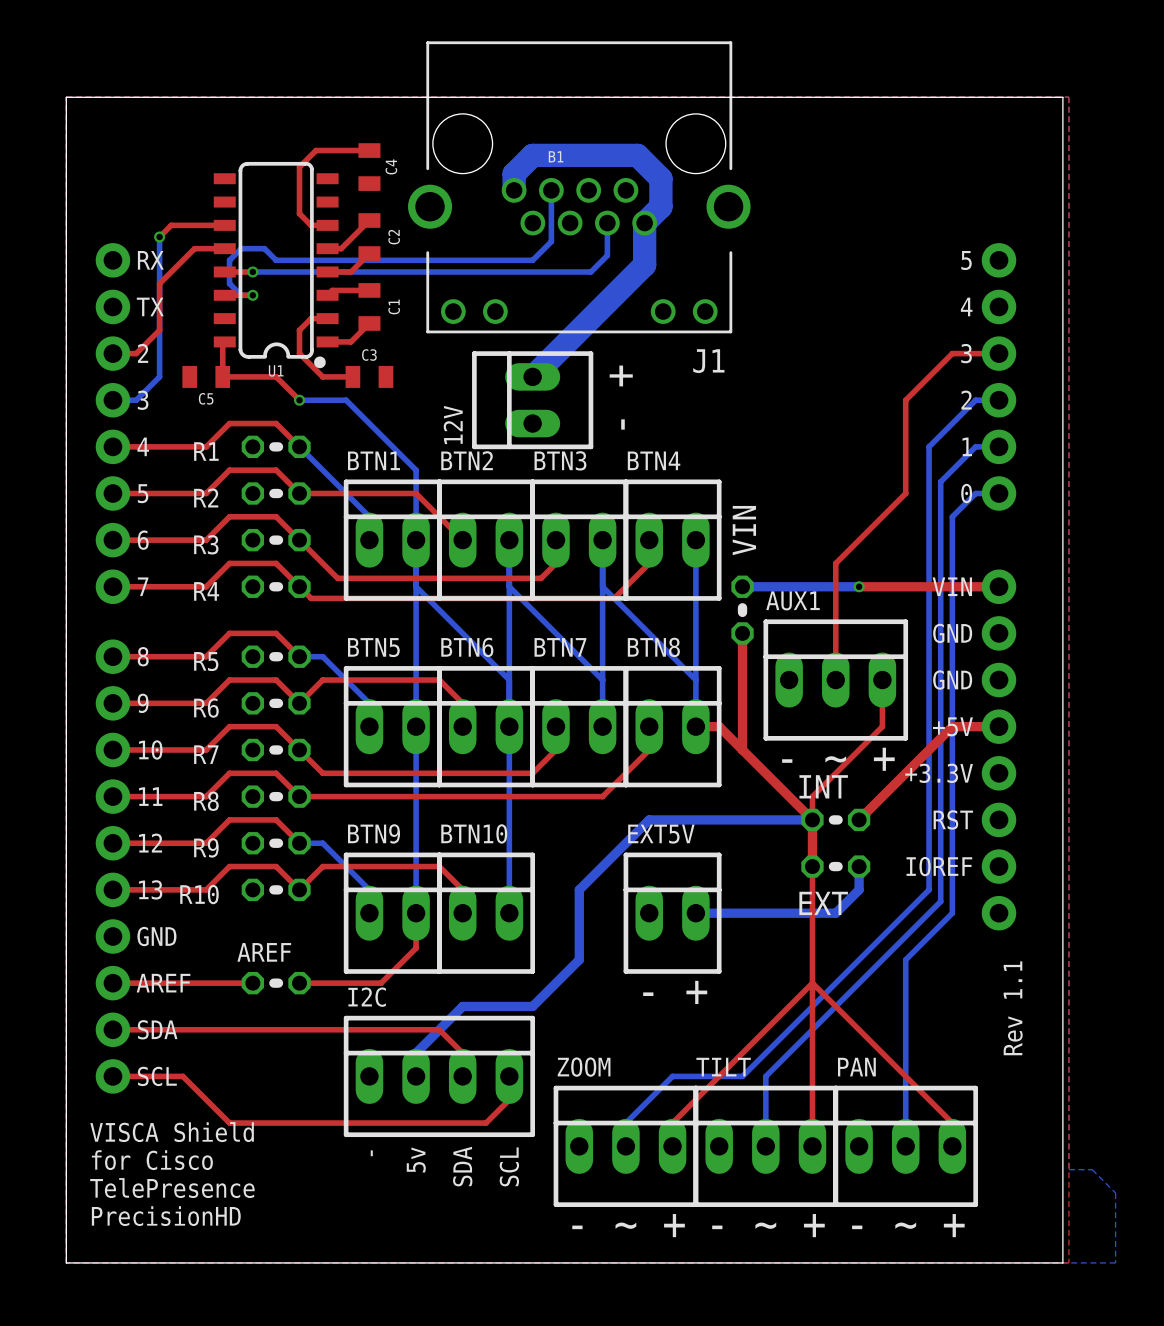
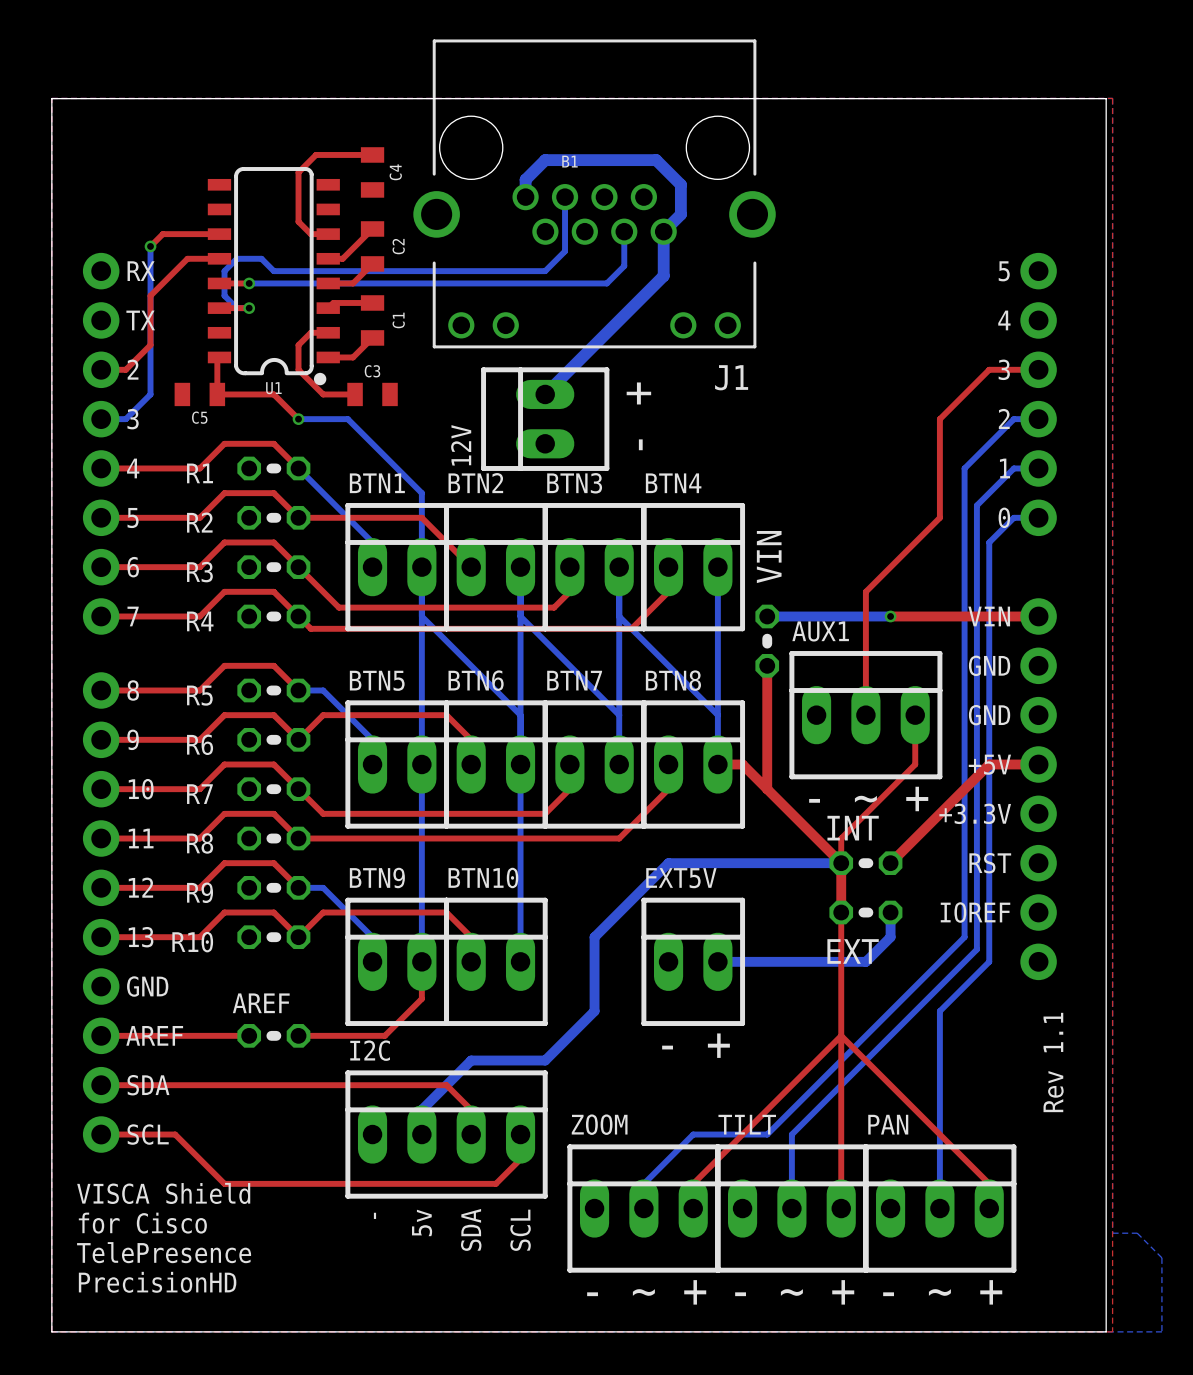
bottom track width: thick (514, 190) (514, 173) (532, 155) (637, 155) (660, 178) (660, 206) (644, 223) (644, 264) (532, 376) -> thin (525, 197) (525, 179) (545, 160) (656, 160) (680, 184) (680, 214) (663, 231) (663, 275) (545, 394)

